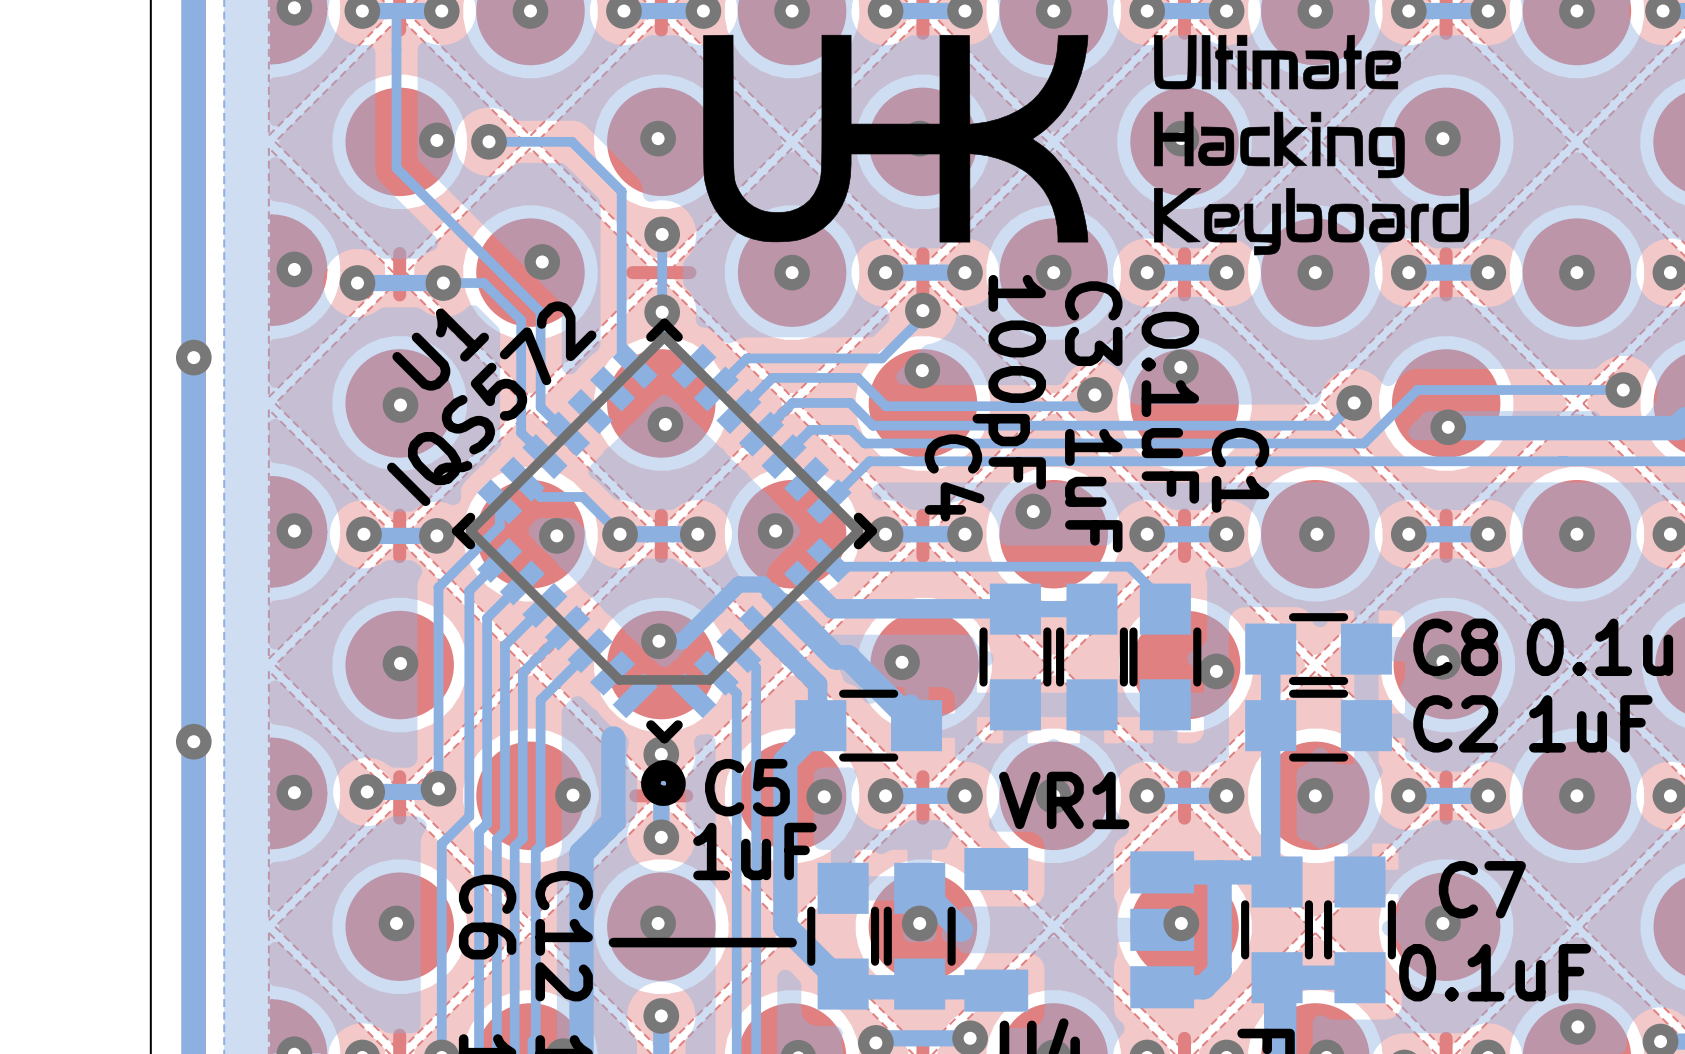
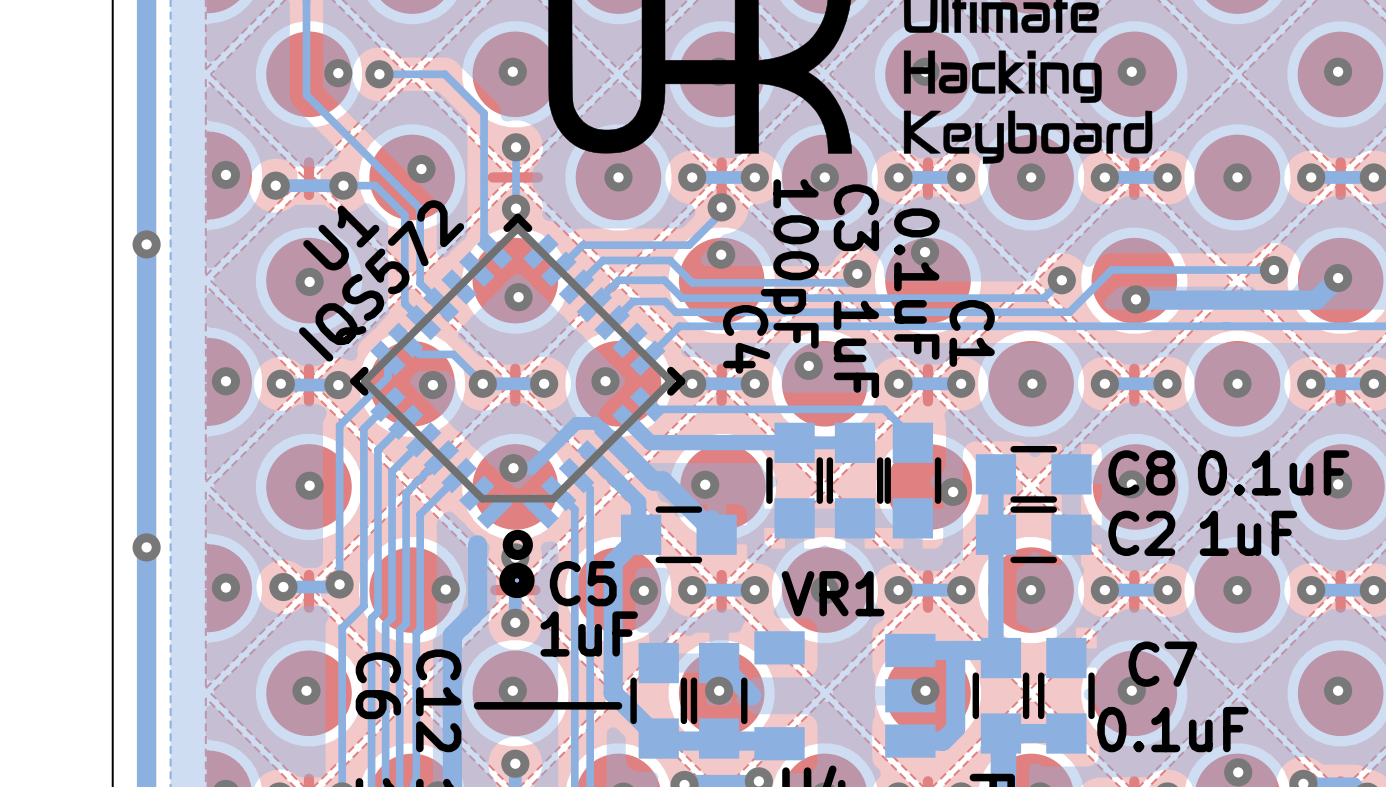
U1 footprint: [452, 318, 877, 799] -> [350, 213, 686, 561]

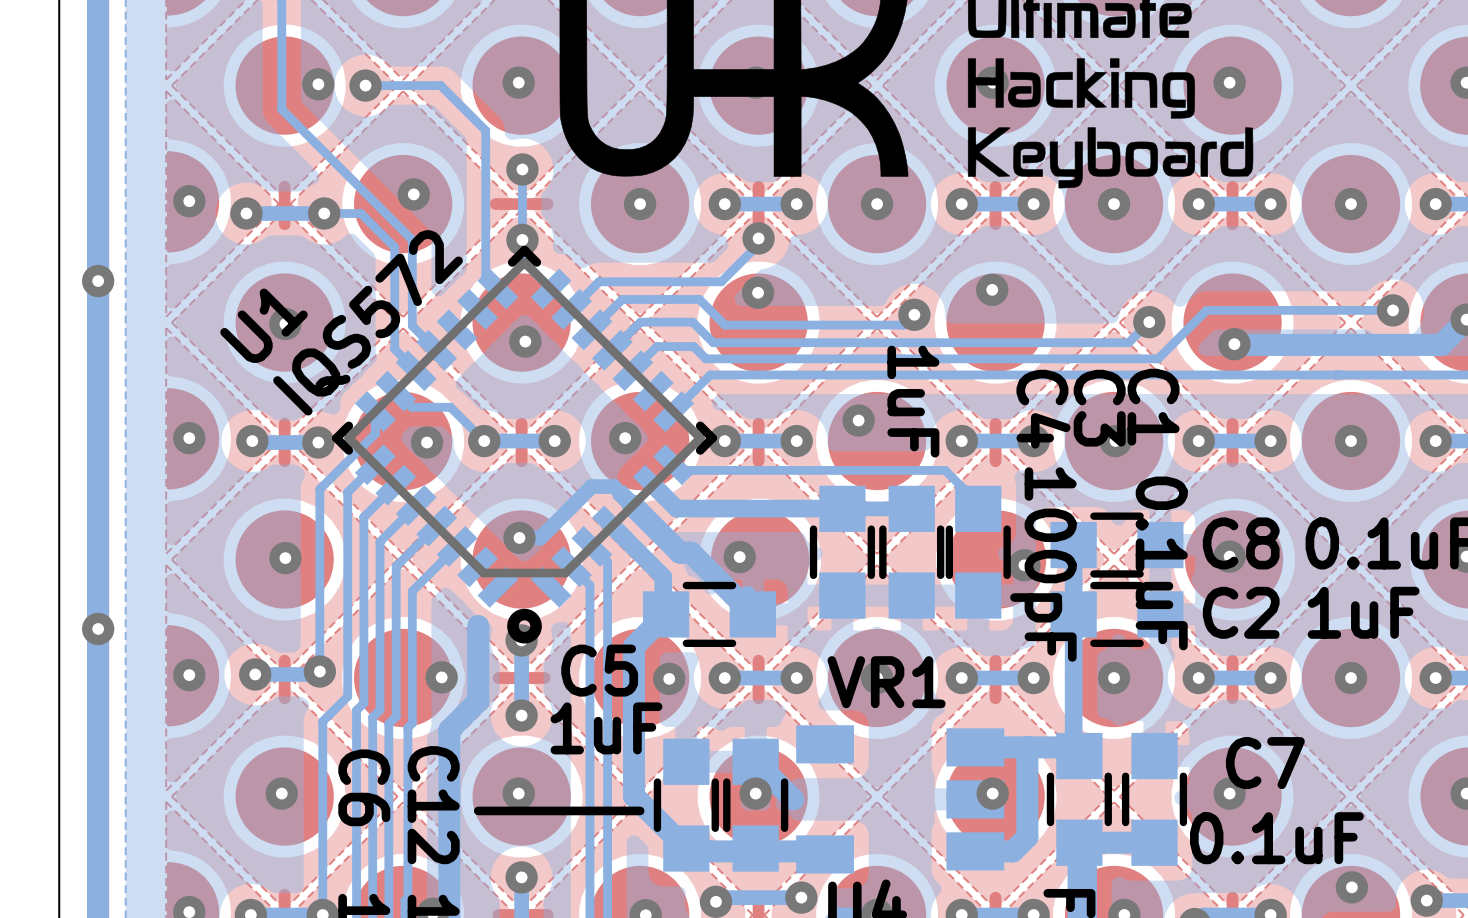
C3 name position: C3 (856, 217) -> C3 (1099, 408)
U1 name position: U1 (341, 238) -> U1 (264, 325)
C4 value position: 100pF (789, 263) -> 100pF (1043, 564)
C1 value position: 0.1uF (916, 284) -> 0.1uF (1161, 563)
C1 name position: C1 (972, 333) -> C1 (1153, 407)
C4 name position: C4 (746, 339) -> C4 (1043, 409)
drawing: [499, 562, 535, 599] -> none

